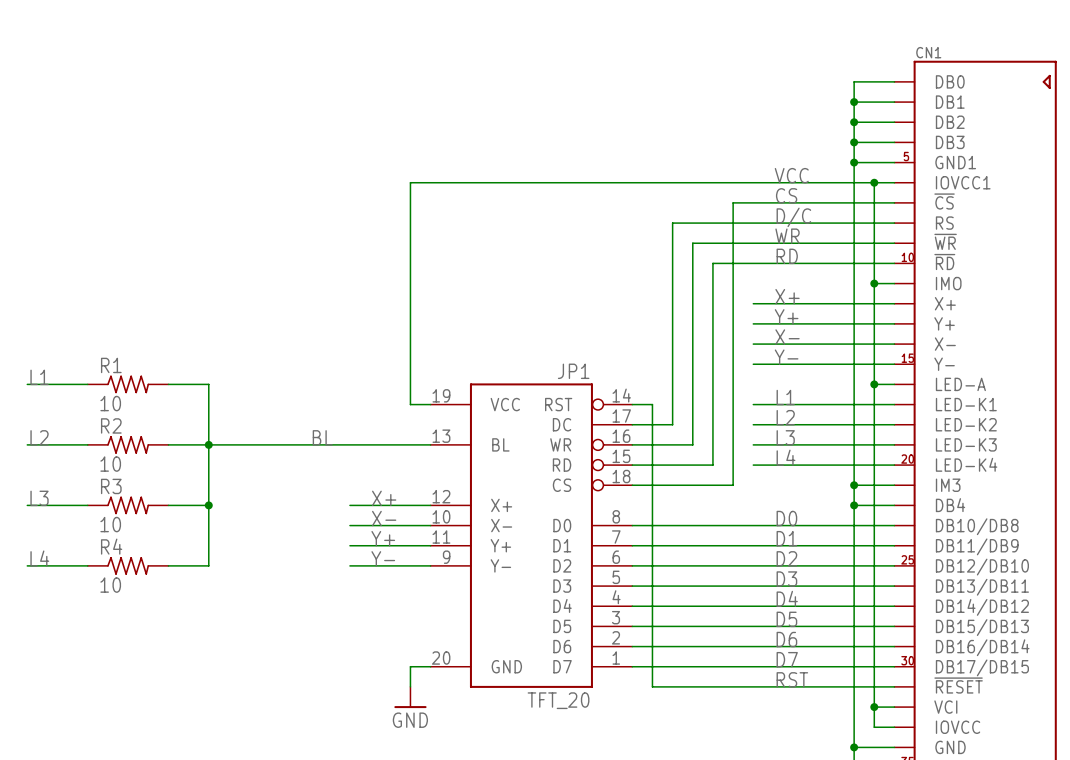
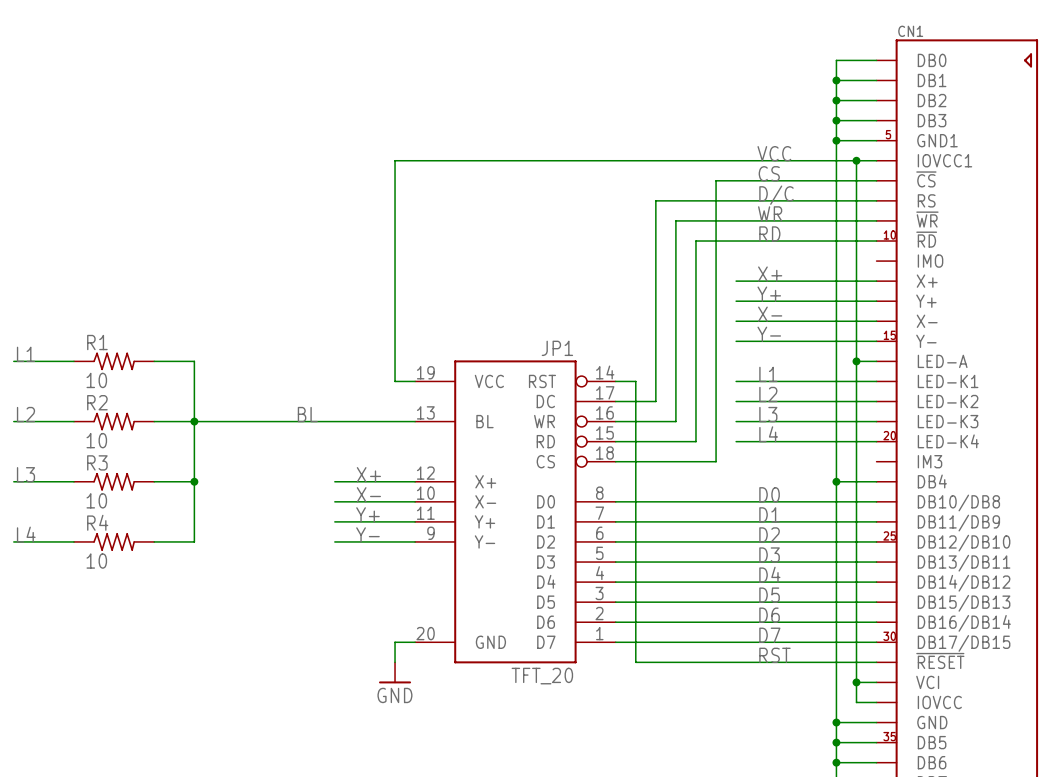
wire: (874, 283) (894, 283) -> none
junction: (874, 283) -> none
wire: (854, 485) (894, 485) -> none
junction: (854, 485) -> none

